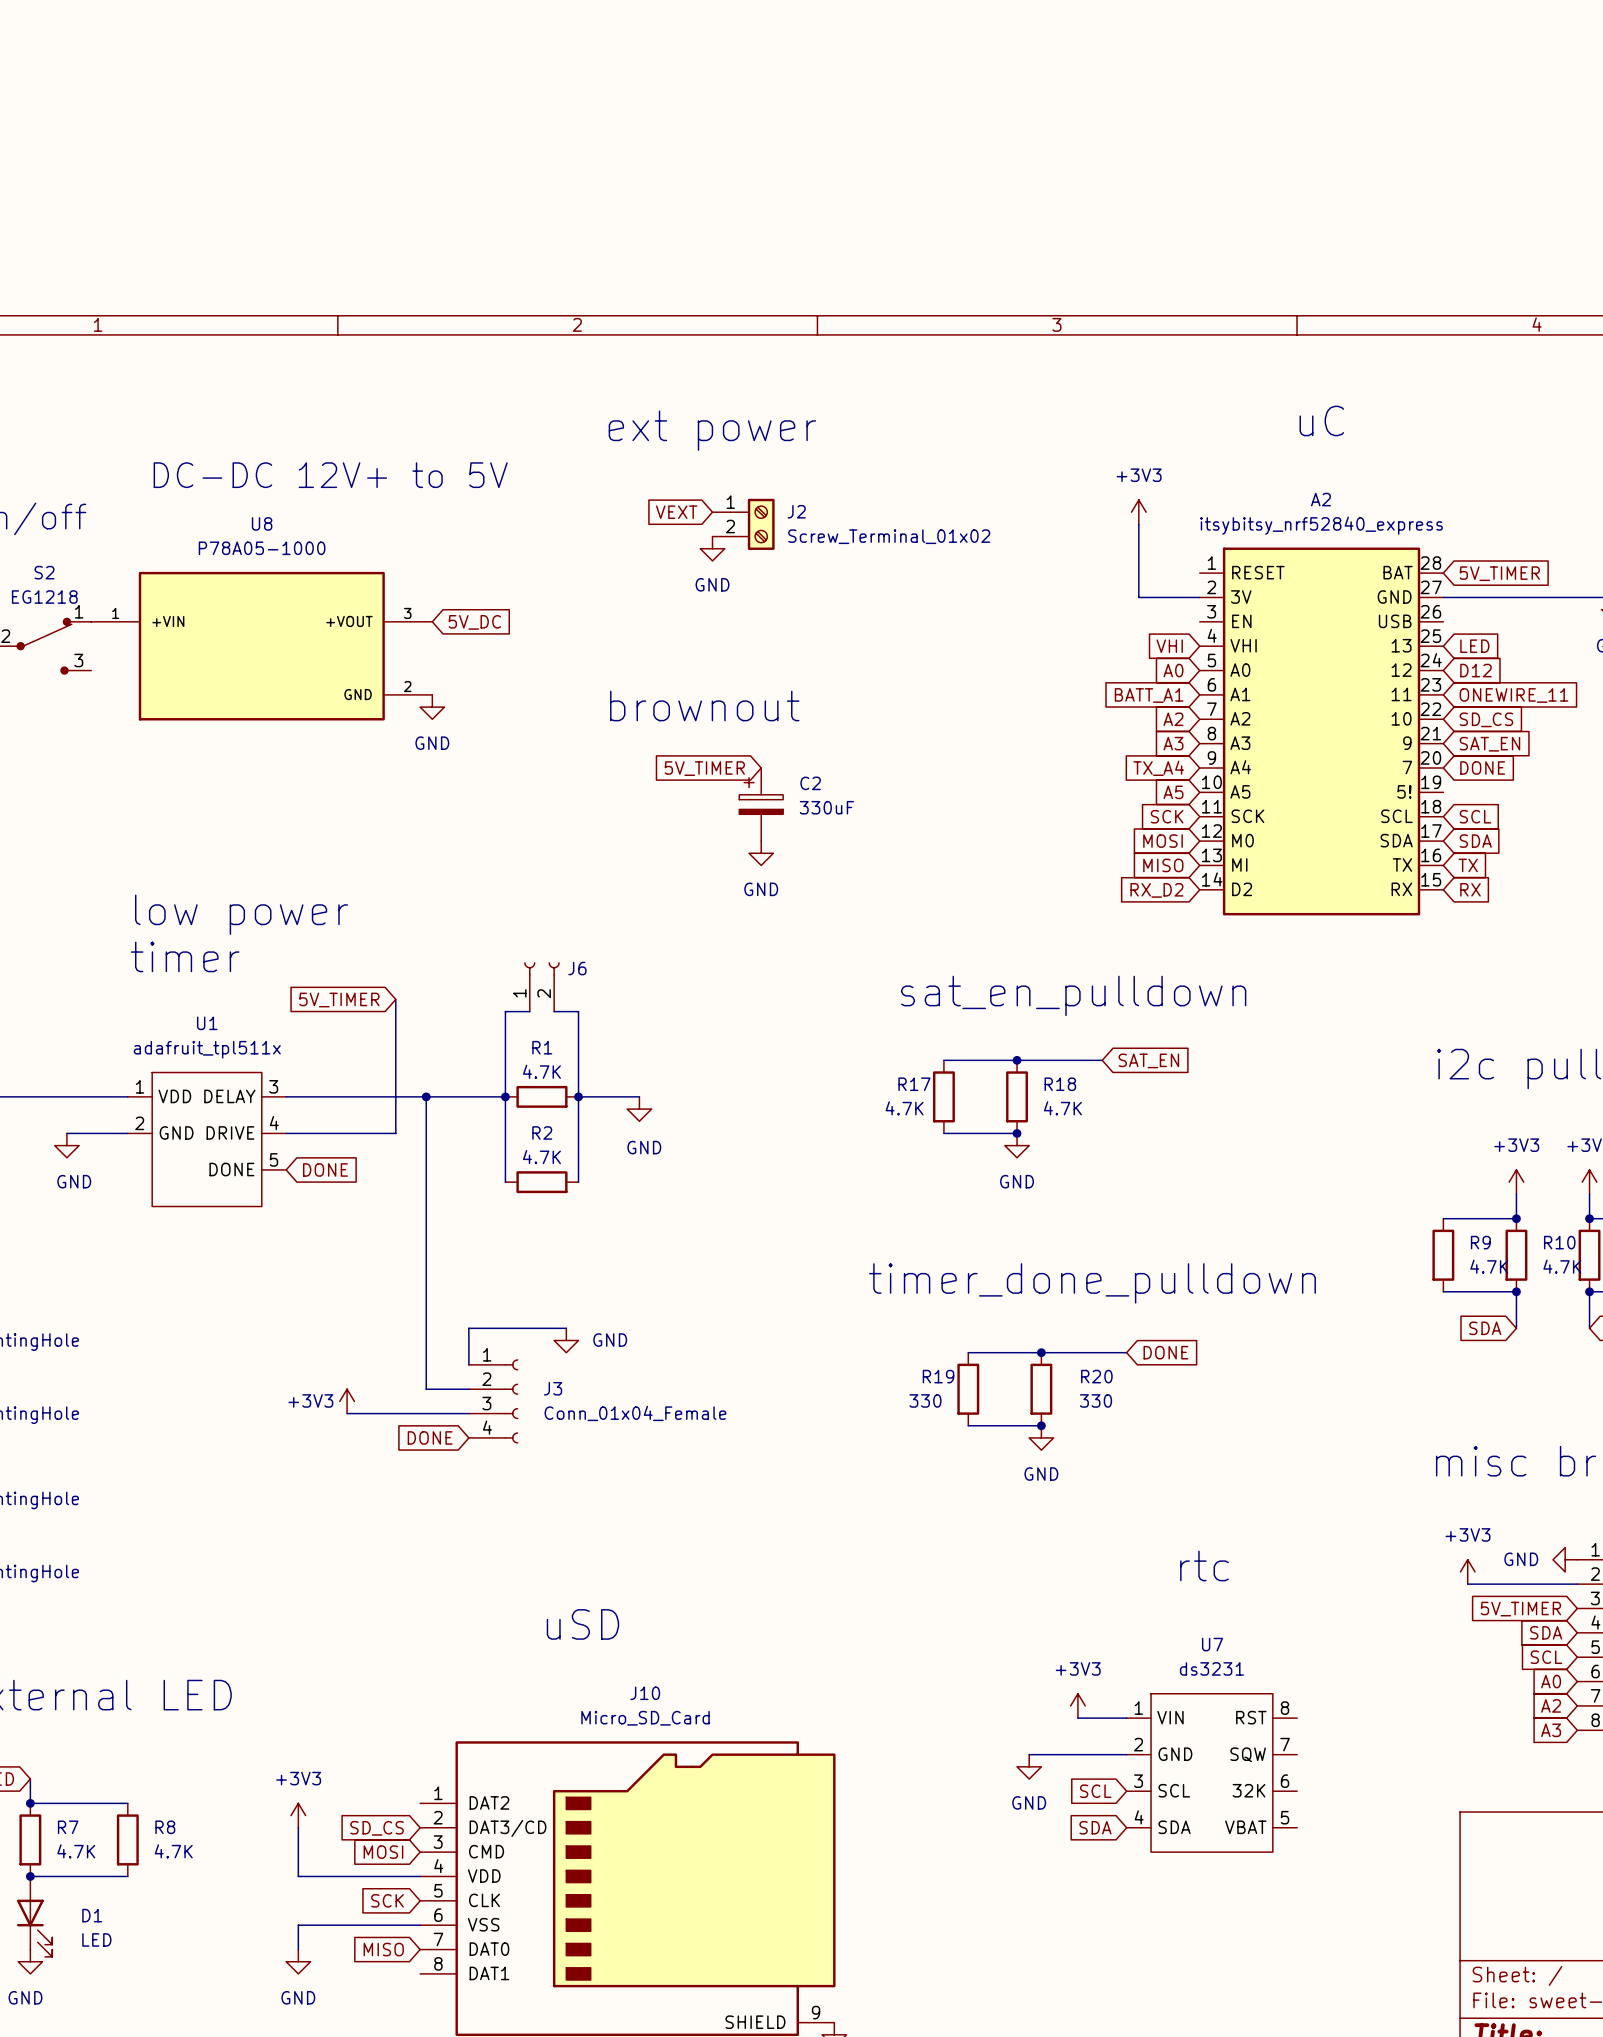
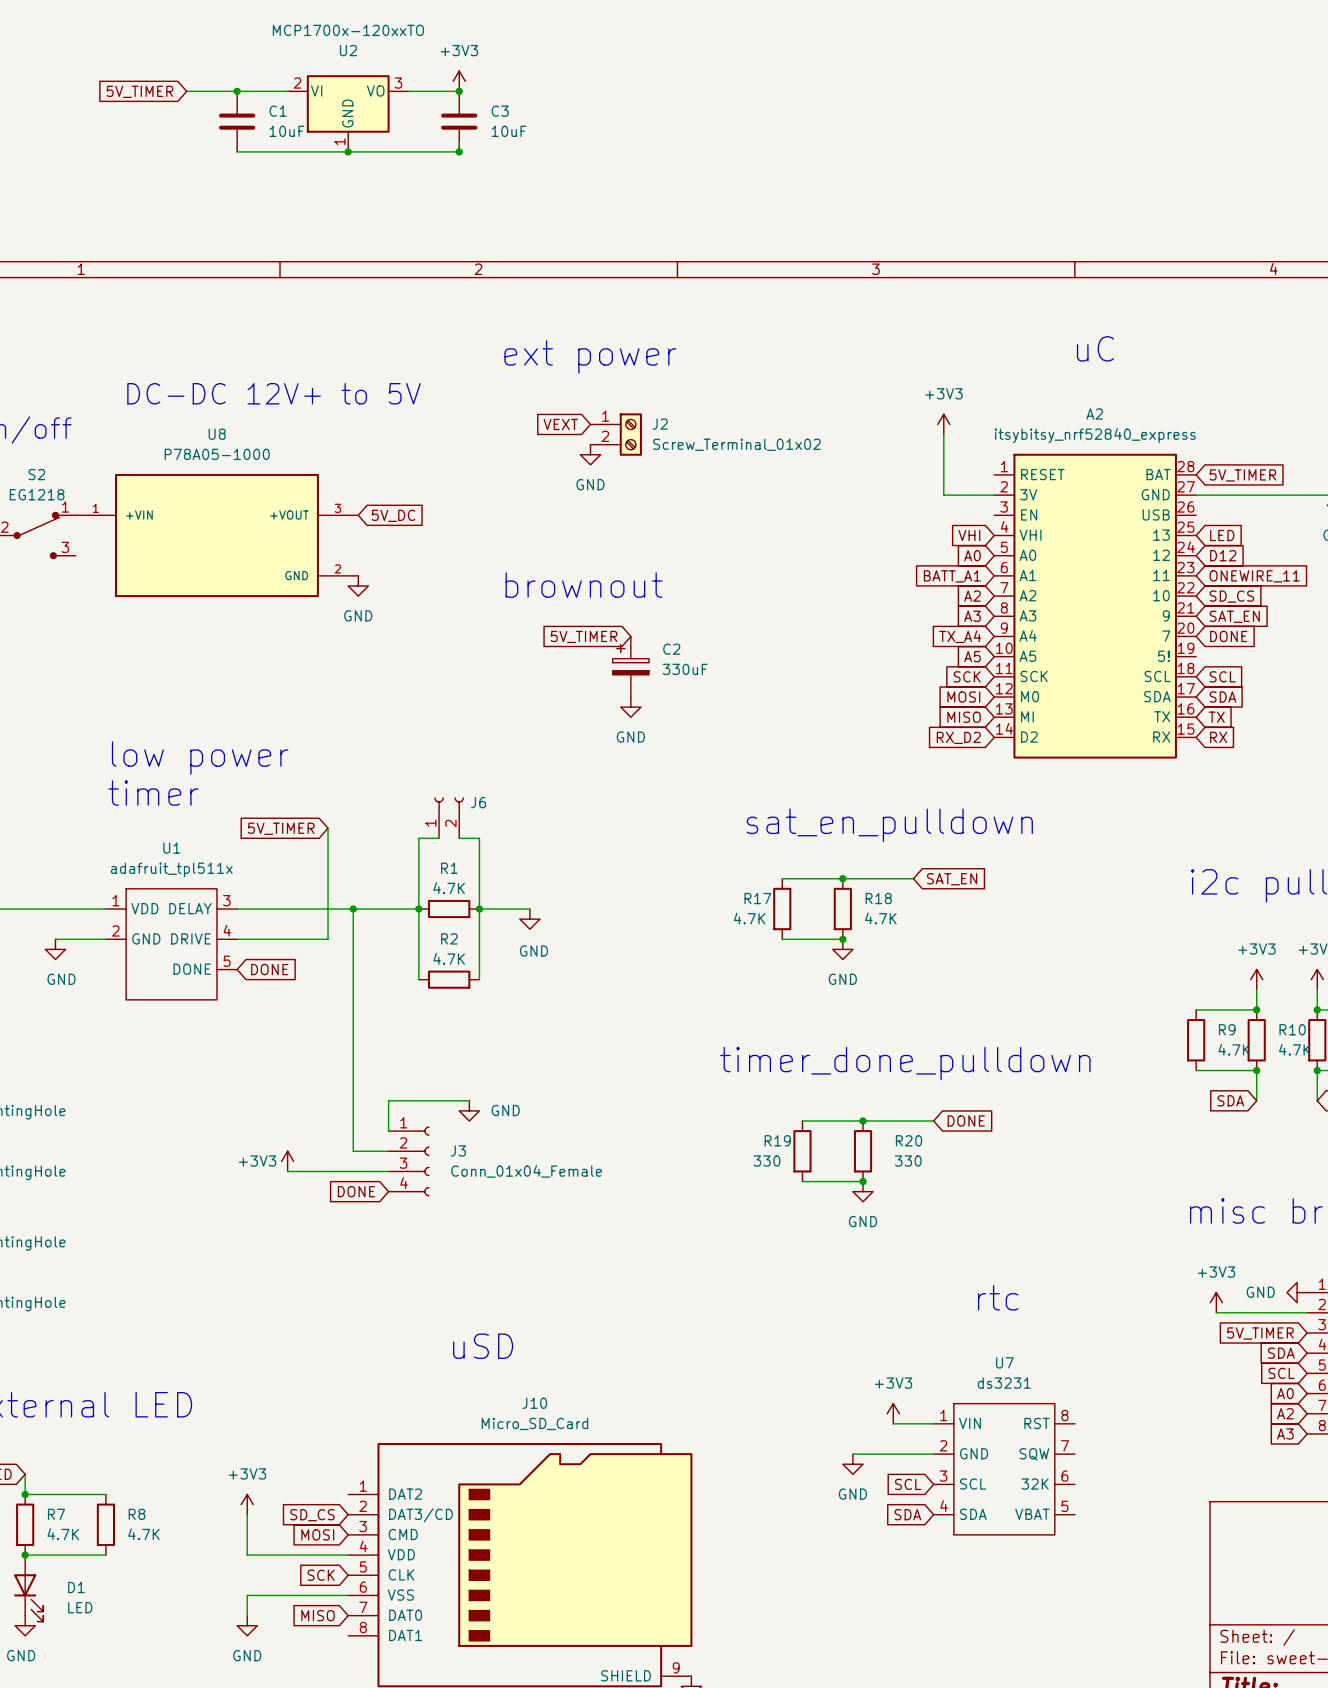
power symbol: none -> +3V3 (459, 81)
global label: none -> 5V_TIMER (139, 91)
wire: none -> (186, 91) (287, 91)
junction: none -> (237, 91)
wire: none -> (408, 91) (459, 91)
junction: none -> (459, 91)
U2: none -> MCP1700x-120xxTO (348, 113)
C1: none -> 10uF (237, 121)
C3: none -> 10uF (459, 121)
wire: none -> (459, 141) (459, 151) (237, 151)
junction: none -> (348, 151)
junction: none -> (459, 151)

